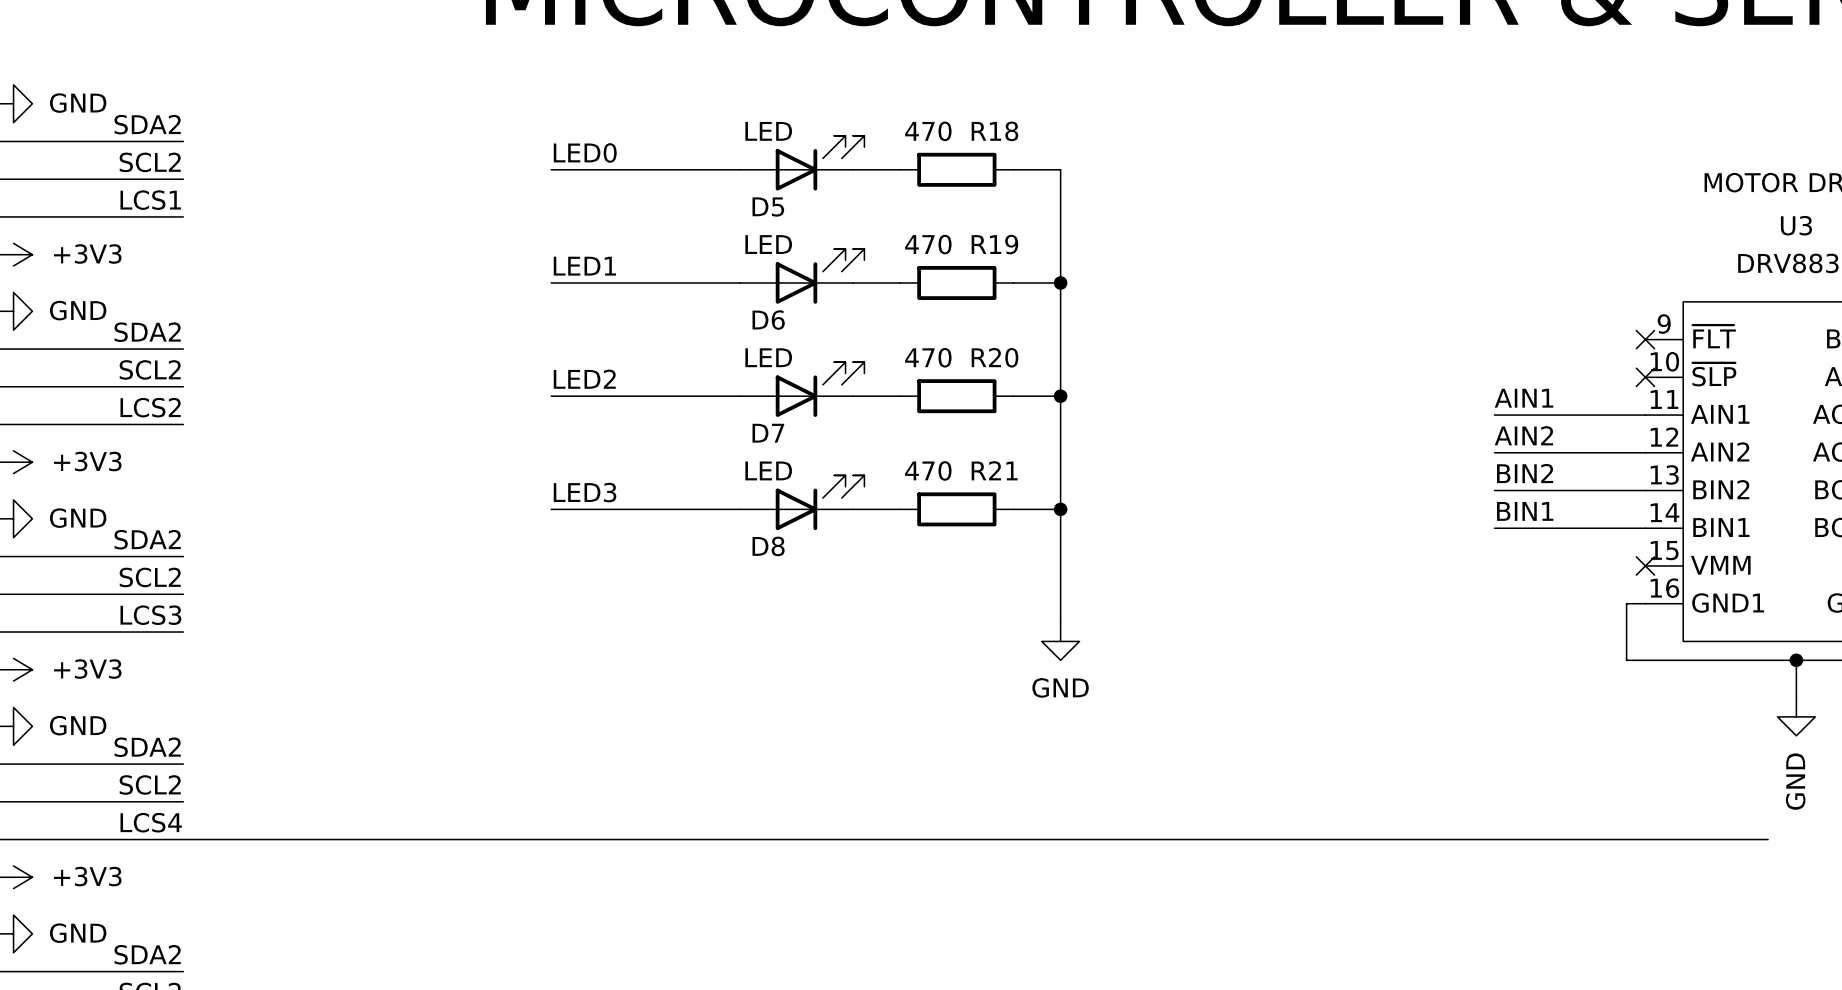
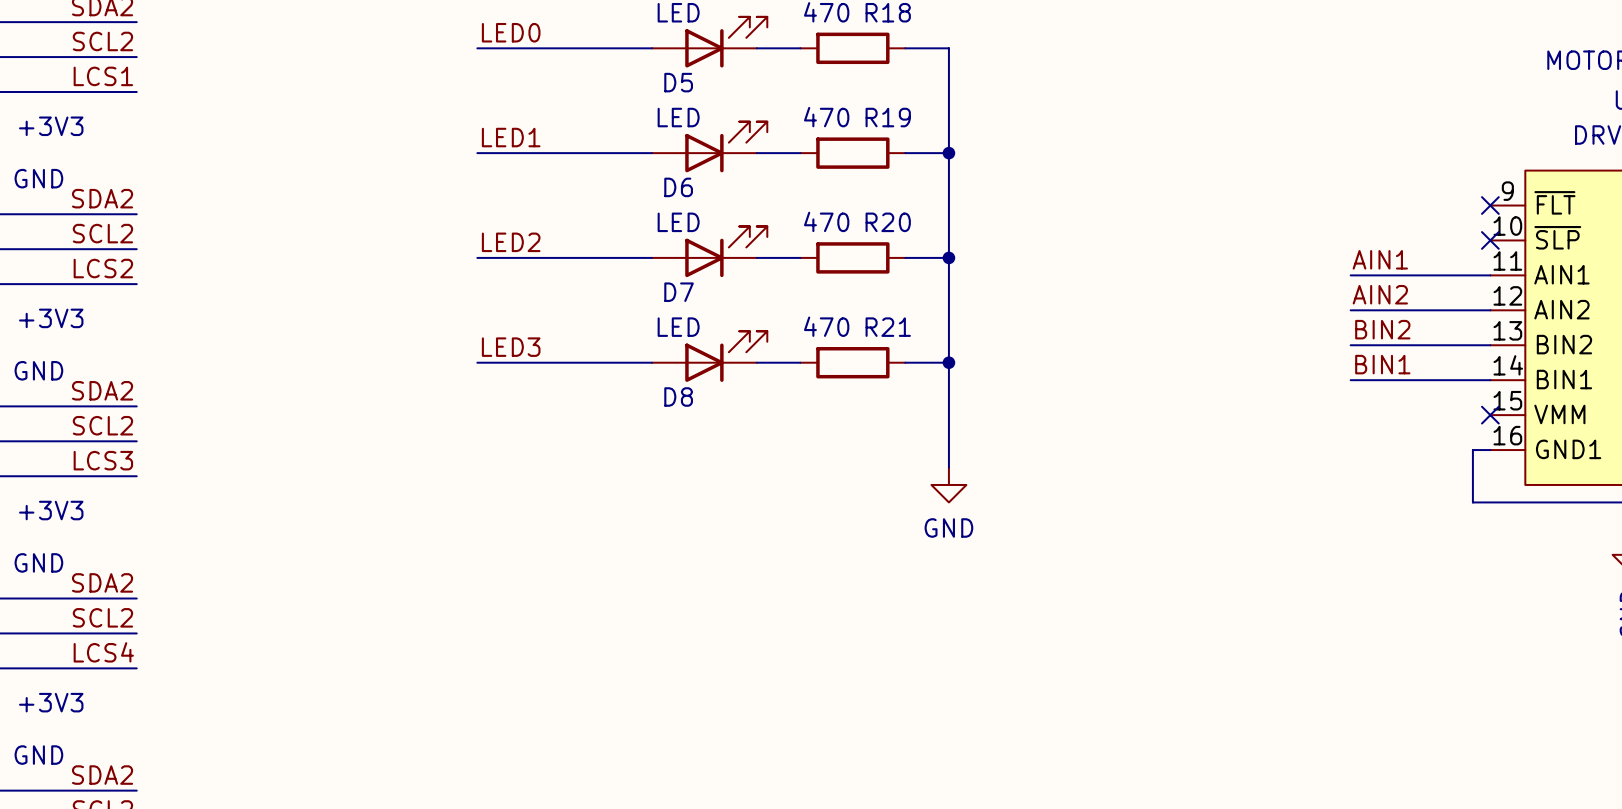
wire: (183, 839) (1768, 839) -> none

